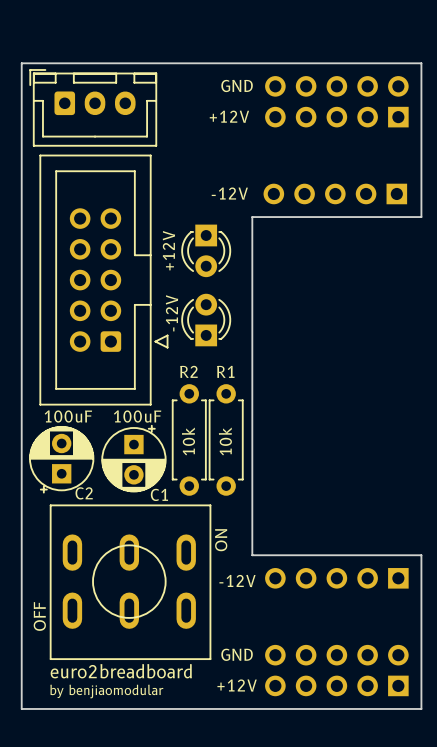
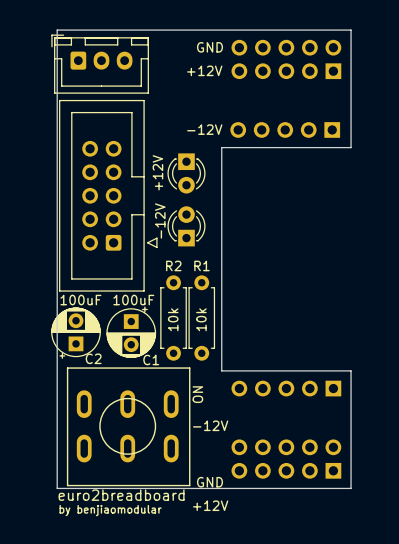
board edge: (37, 63) (21, 63) (21, 708) (421, 708) (421, 662) -> (57, 30) (57, 488) (351, 488)
board edge: (252, 509) (252, 555) (421, 555) -> (221, 370) (351, 370) (351, 406)
part position: (336, 578) -> (286, 388)
text: OFF (39, 616) -> none
part position: (336, 670) -> (286, 459)

